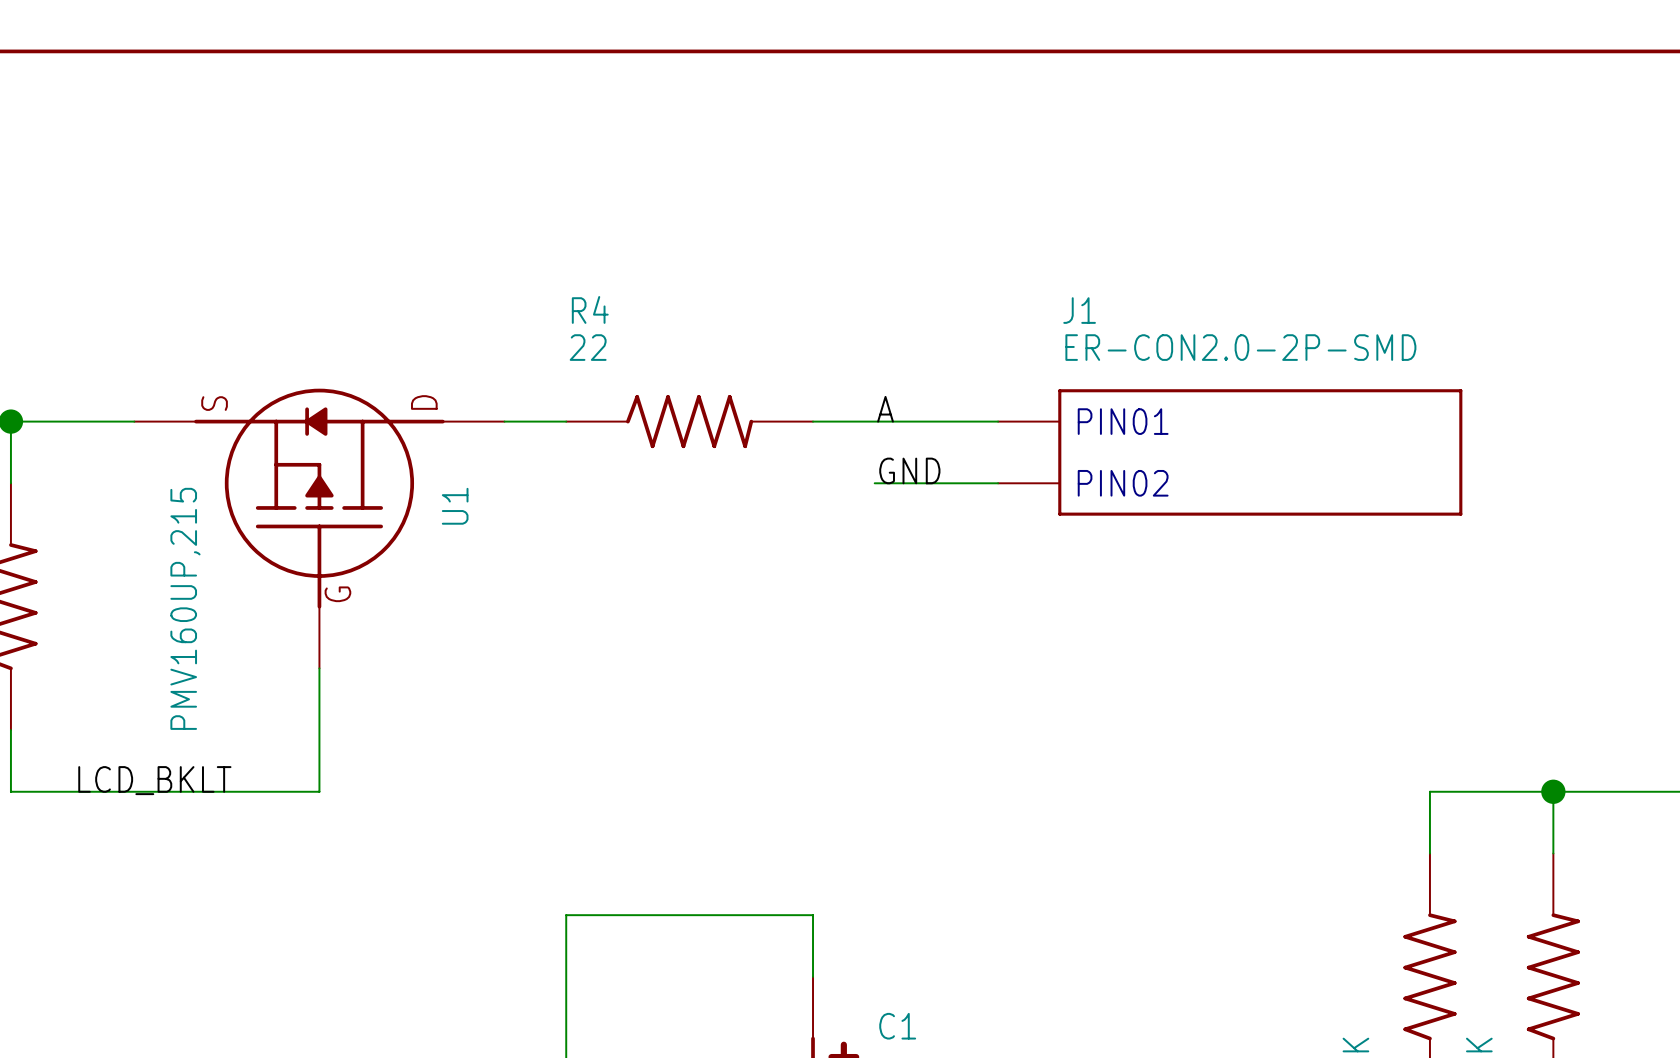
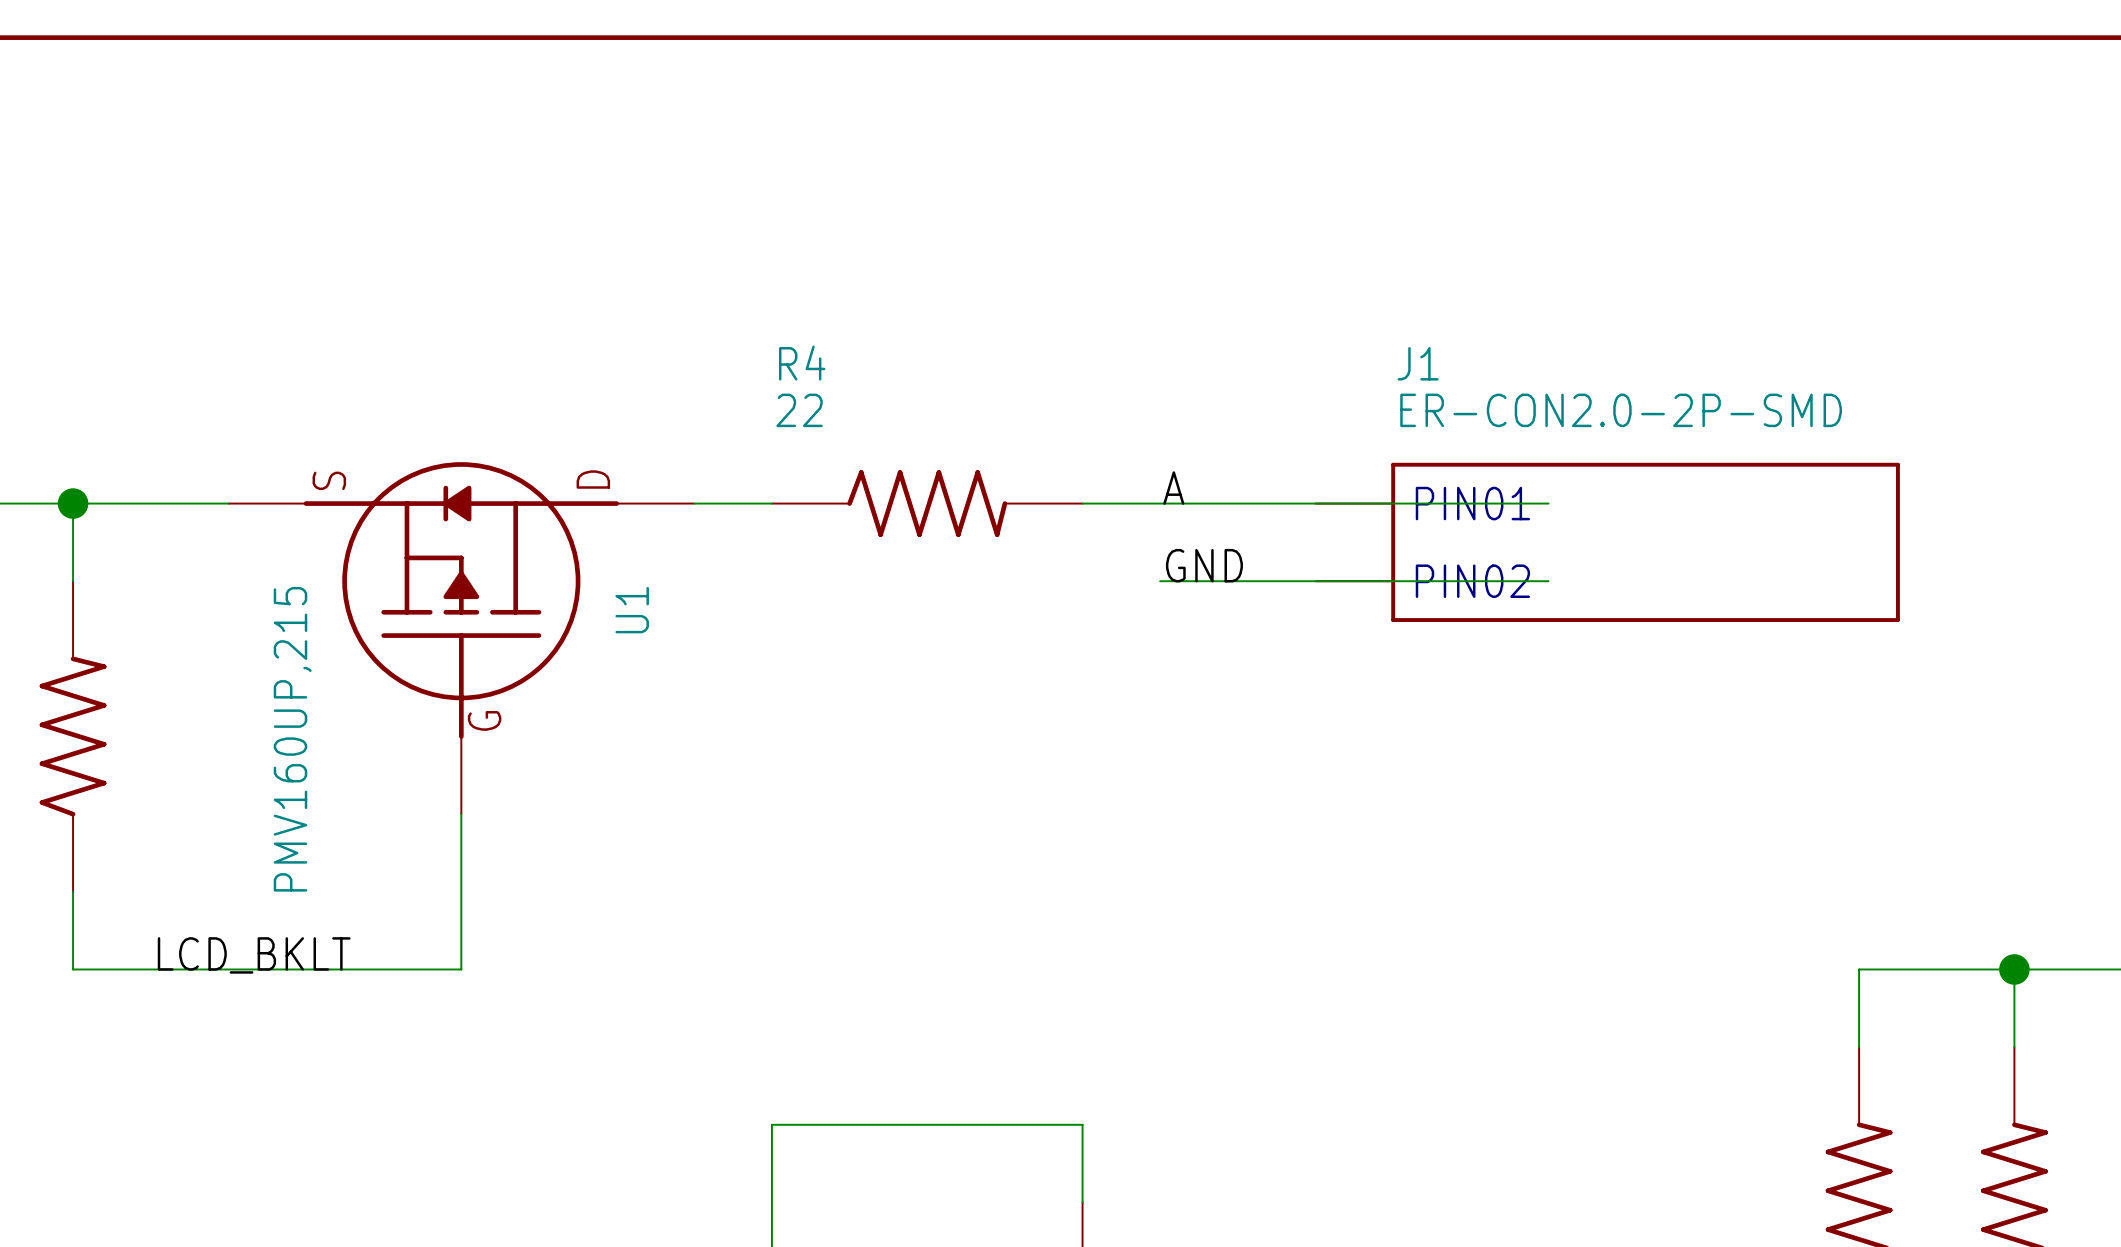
wire: none -> (1315, 503) (1548, 503)
wire: none -> (1315, 581) (1548, 581)

